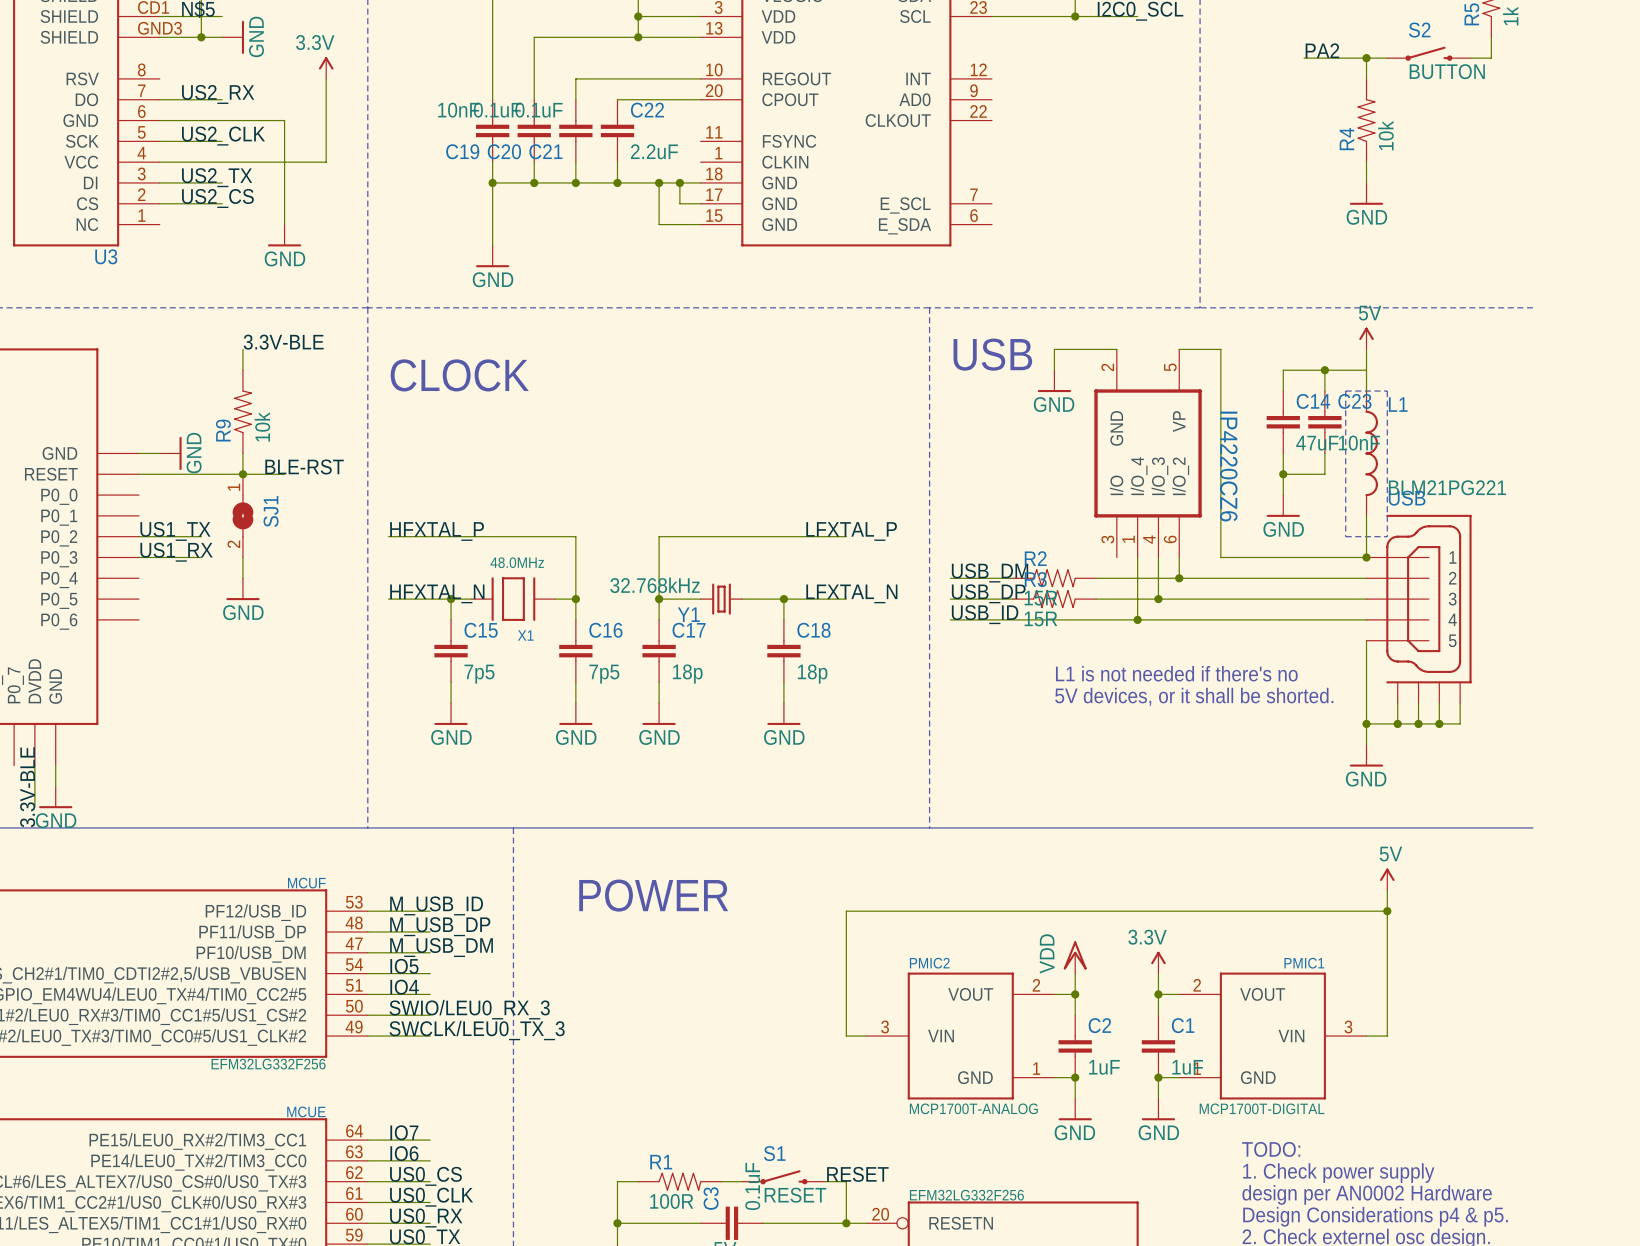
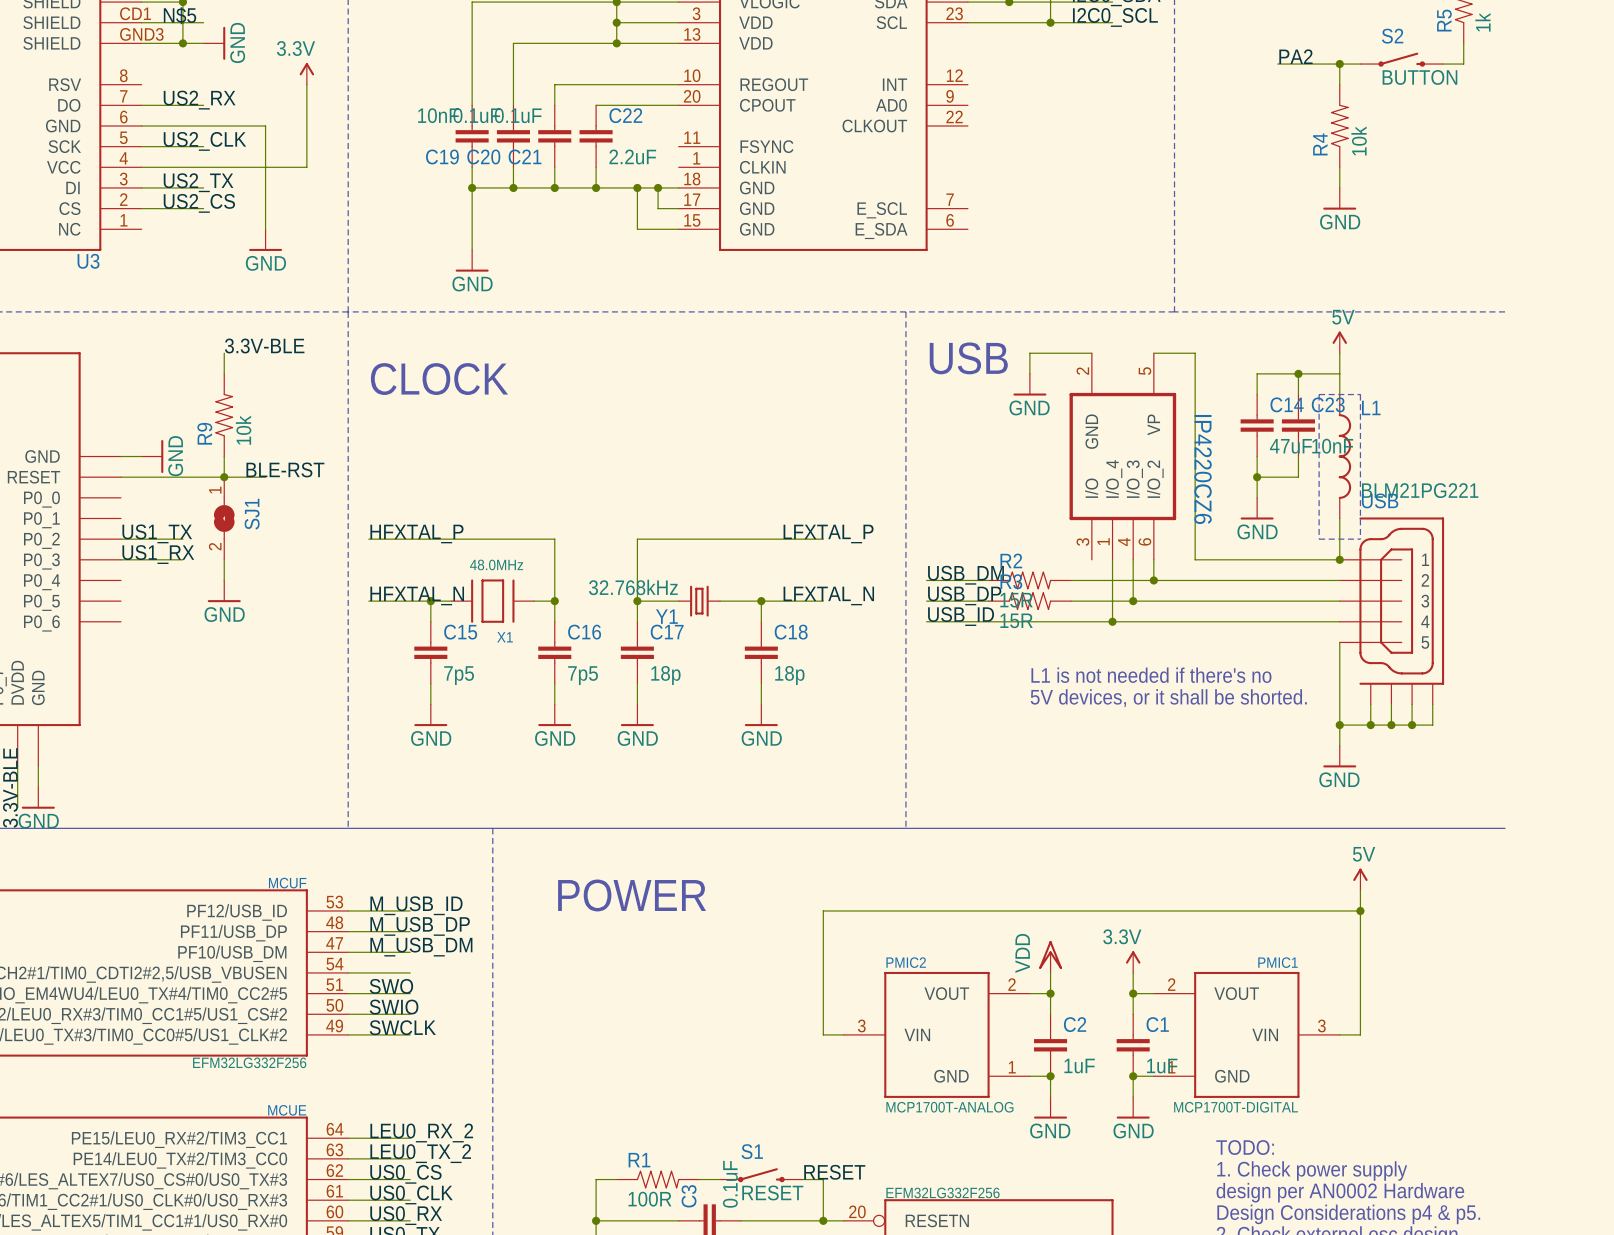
label: IO5 (404, 966) -> none
label: IO4 (404, 987) -> SWO (391, 986)
label: SWIO/LEU0_RX_3 (469, 1009) -> SWIO (394, 1007)
label: SWCLK/LEU0_TX_3 (477, 1030) -> SWCLK (402, 1027)
label: IO7 (404, 1132) -> LEU0_RX_2 (421, 1132)
label: IO6 (404, 1153) -> LEU0_TX_2 (420, 1153)

